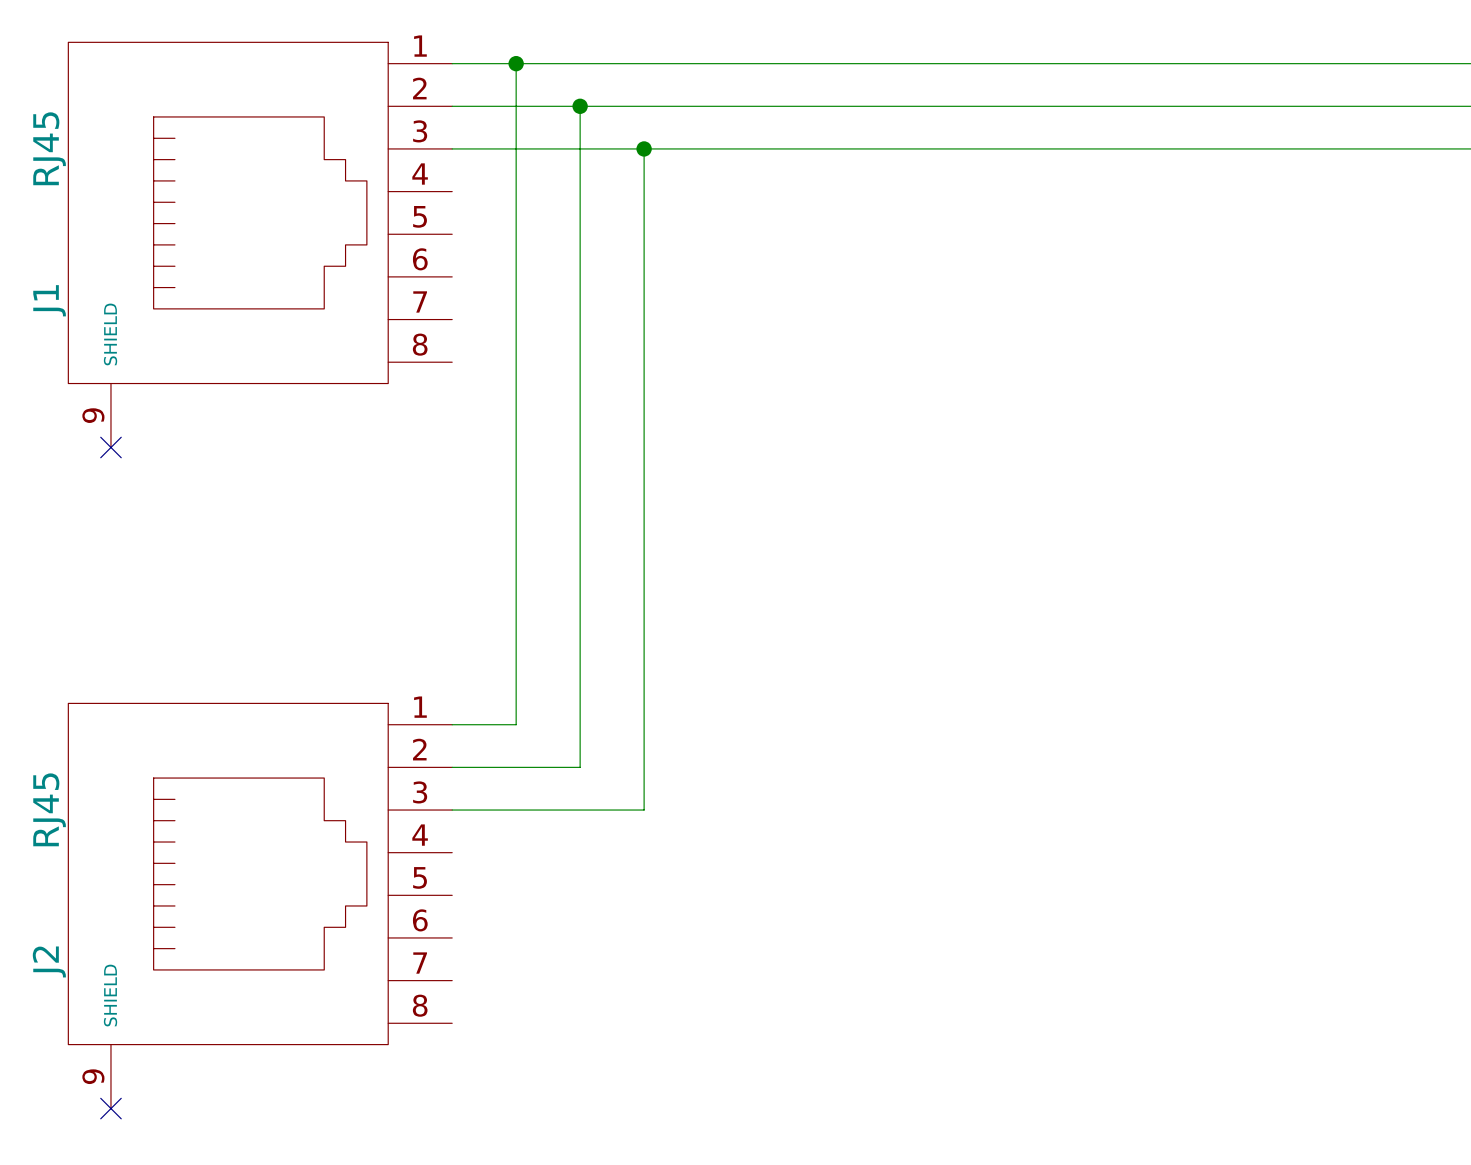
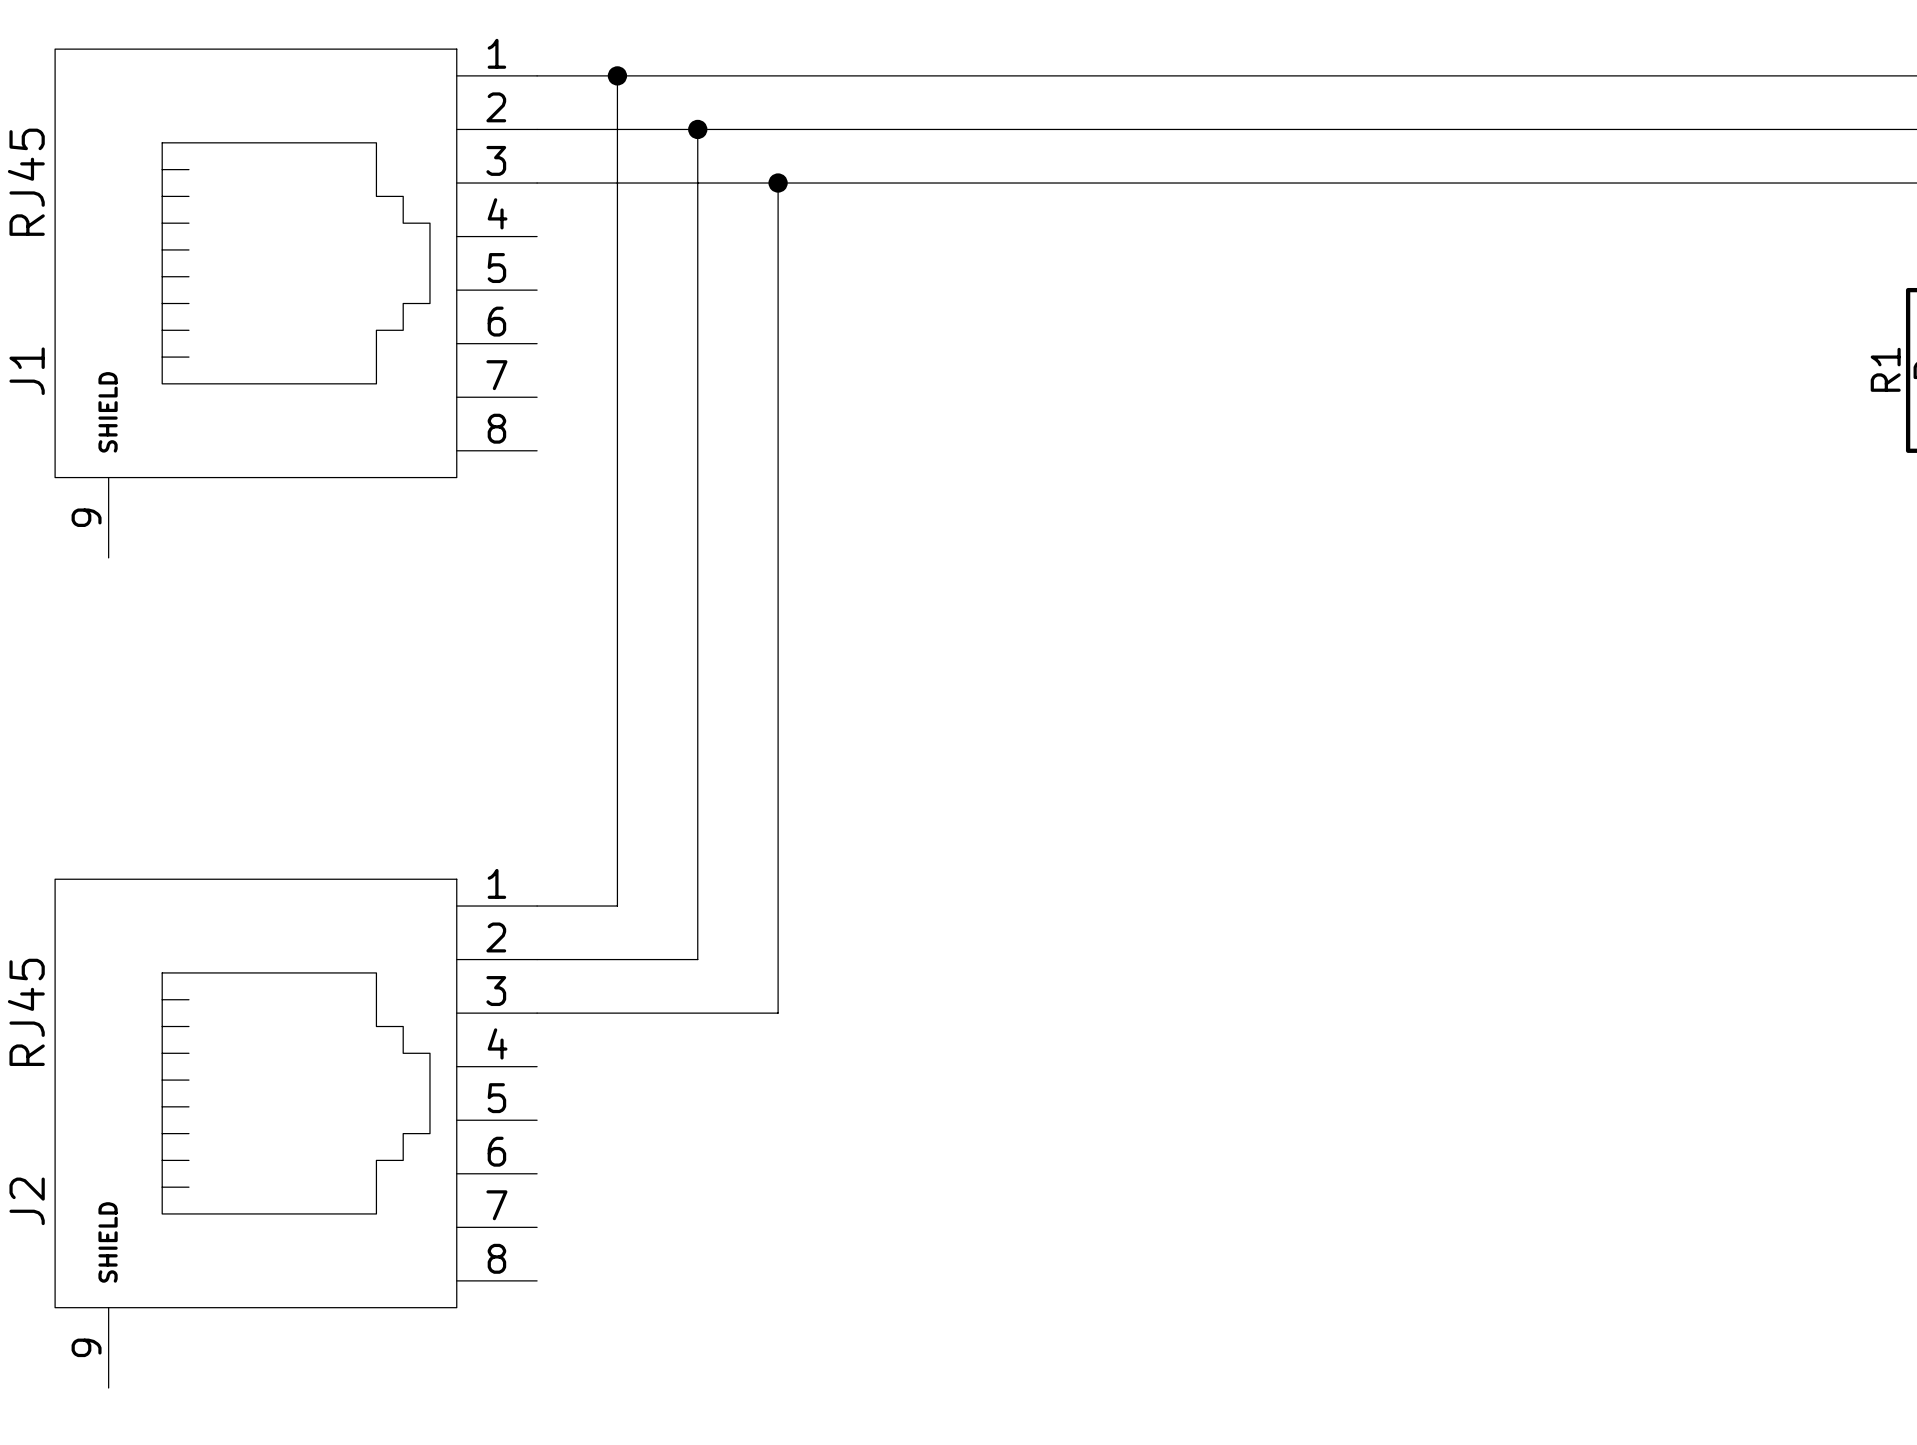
no-connect mark: (110, 447) -> none
no-connect mark: (110, 1108) -> none

